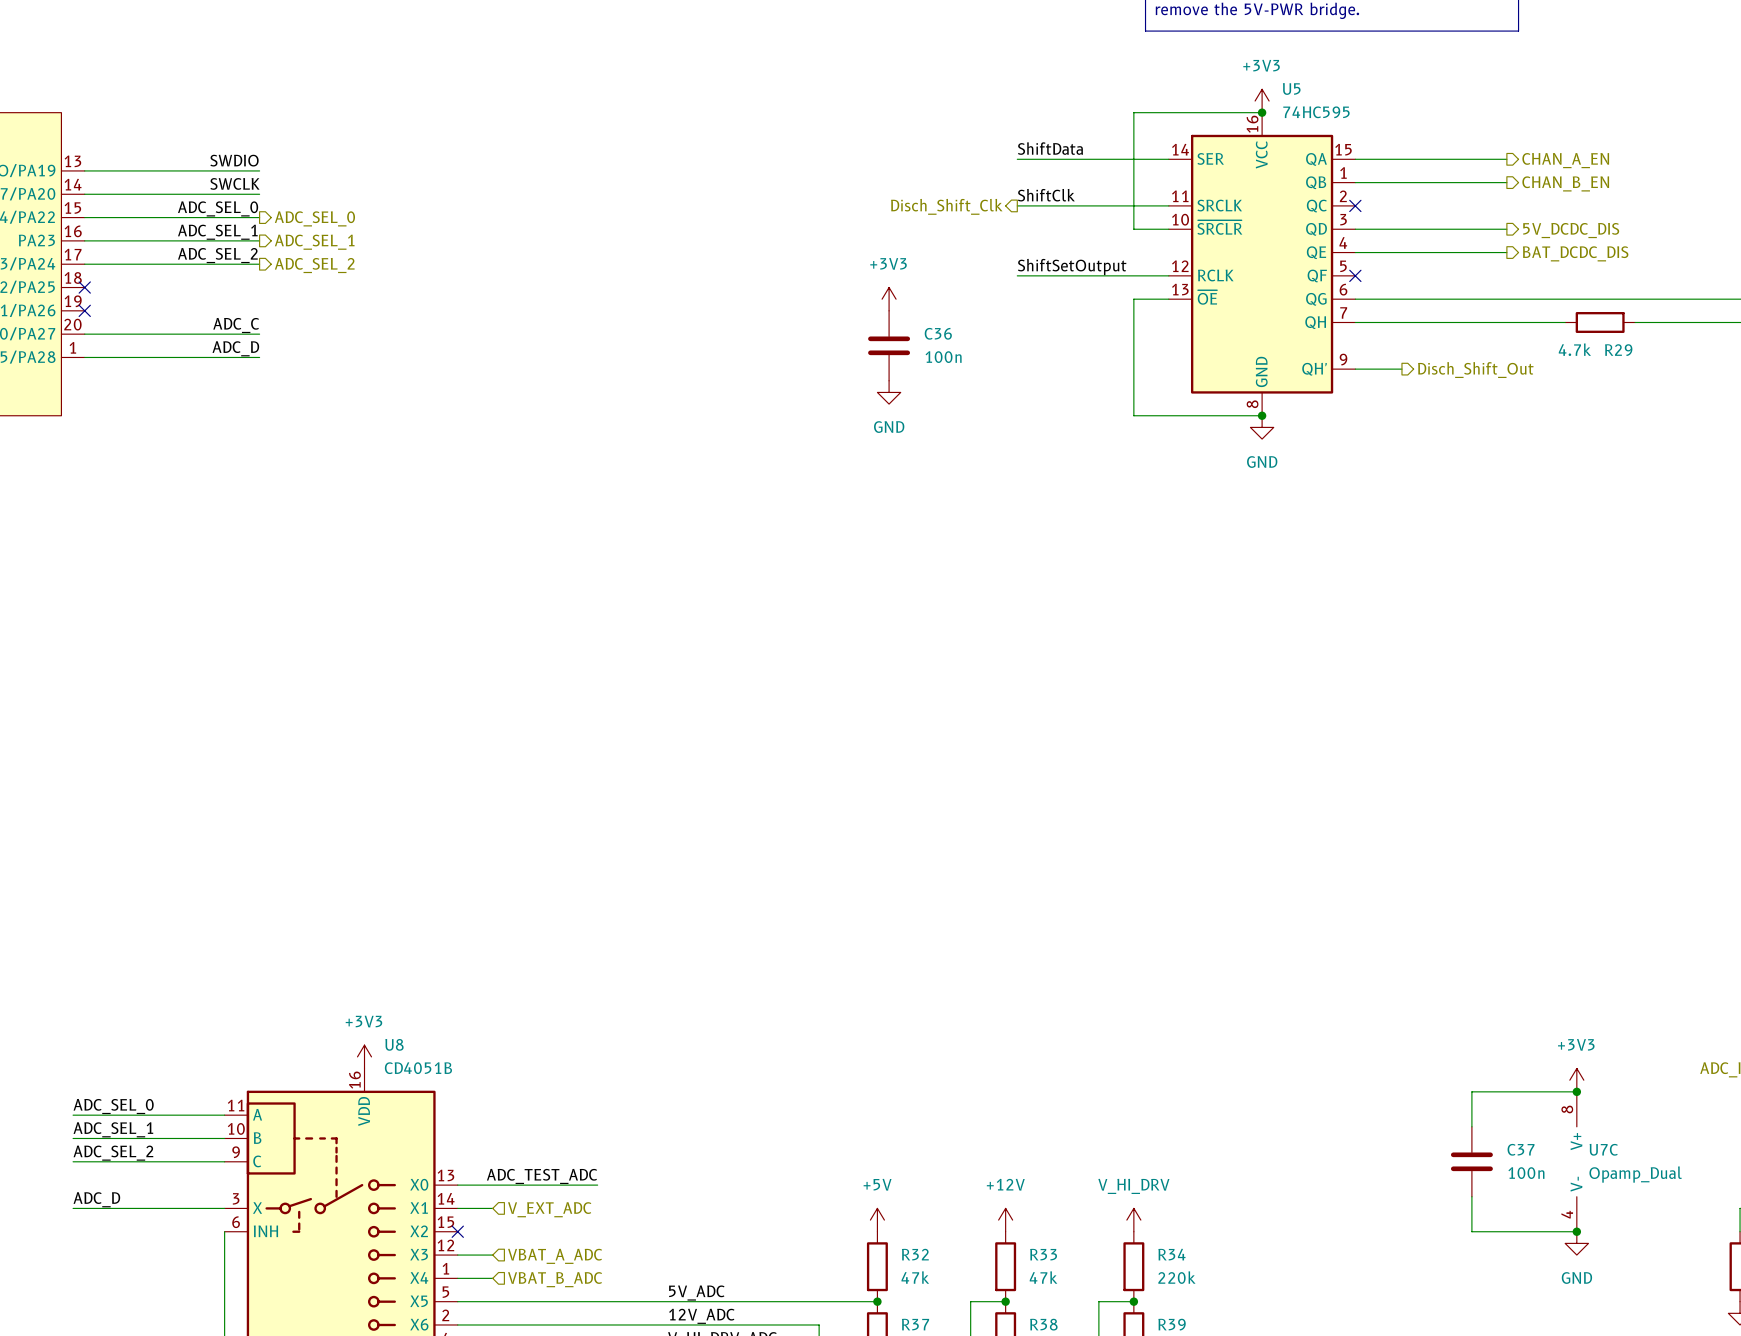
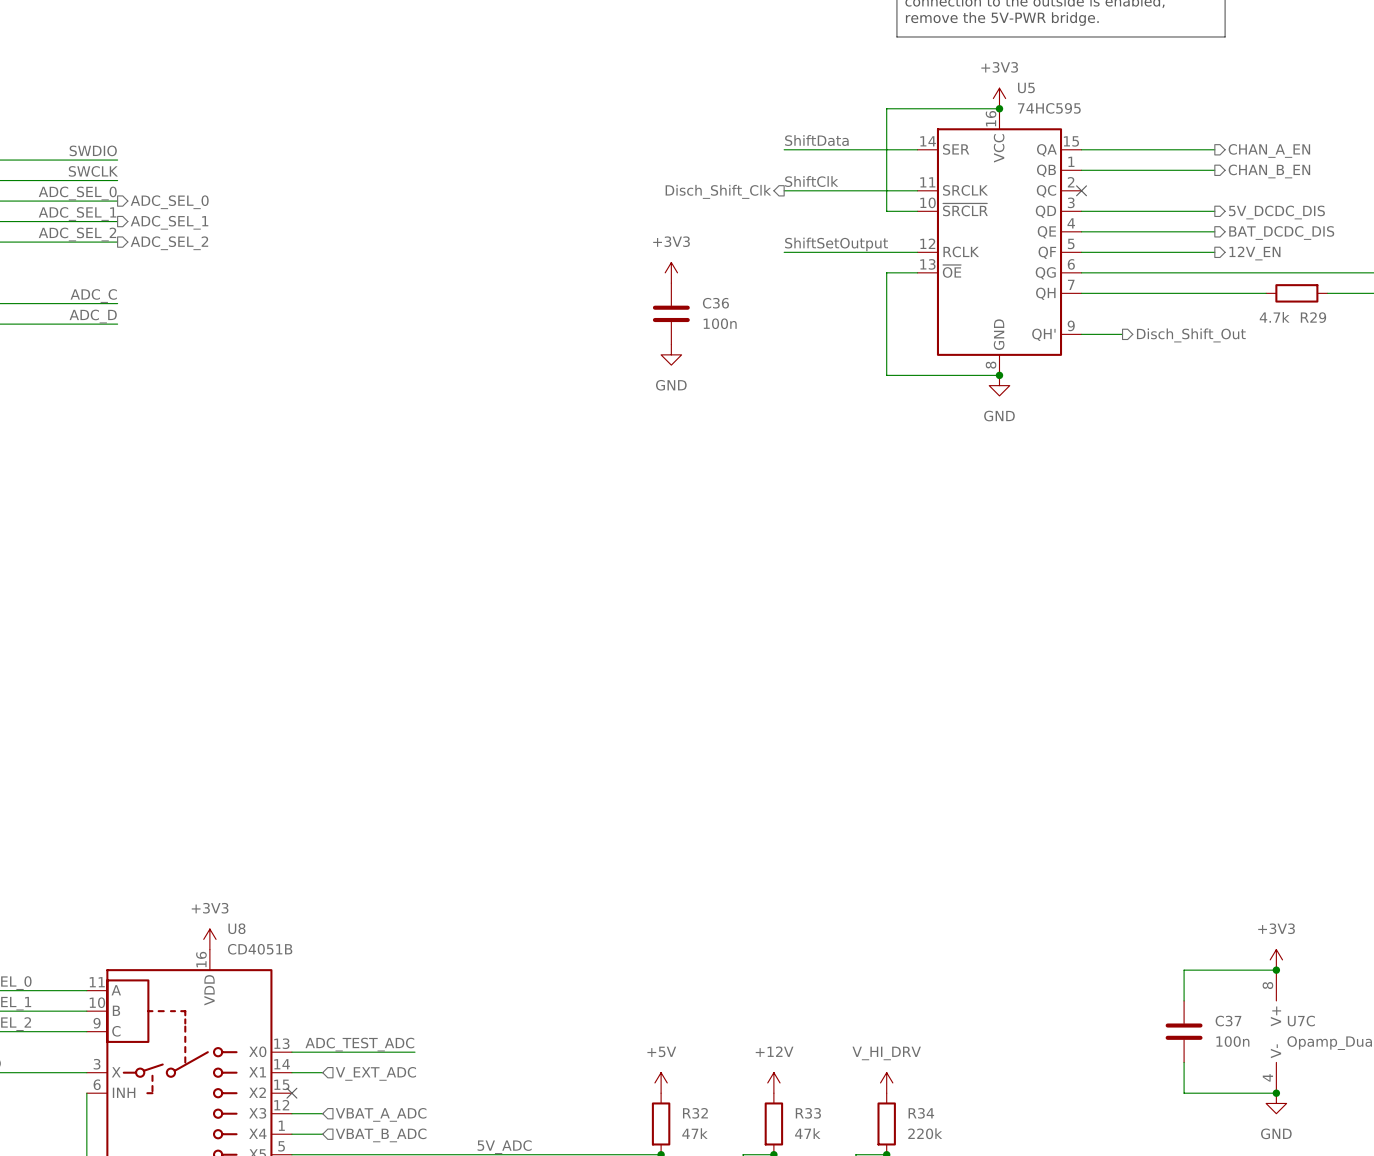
wire: none -> (1081, 252) (1214, 252)
no-connect mark: (1355, 275) -> none
hierarchical label: none -> 12V_EN (1254, 253)

